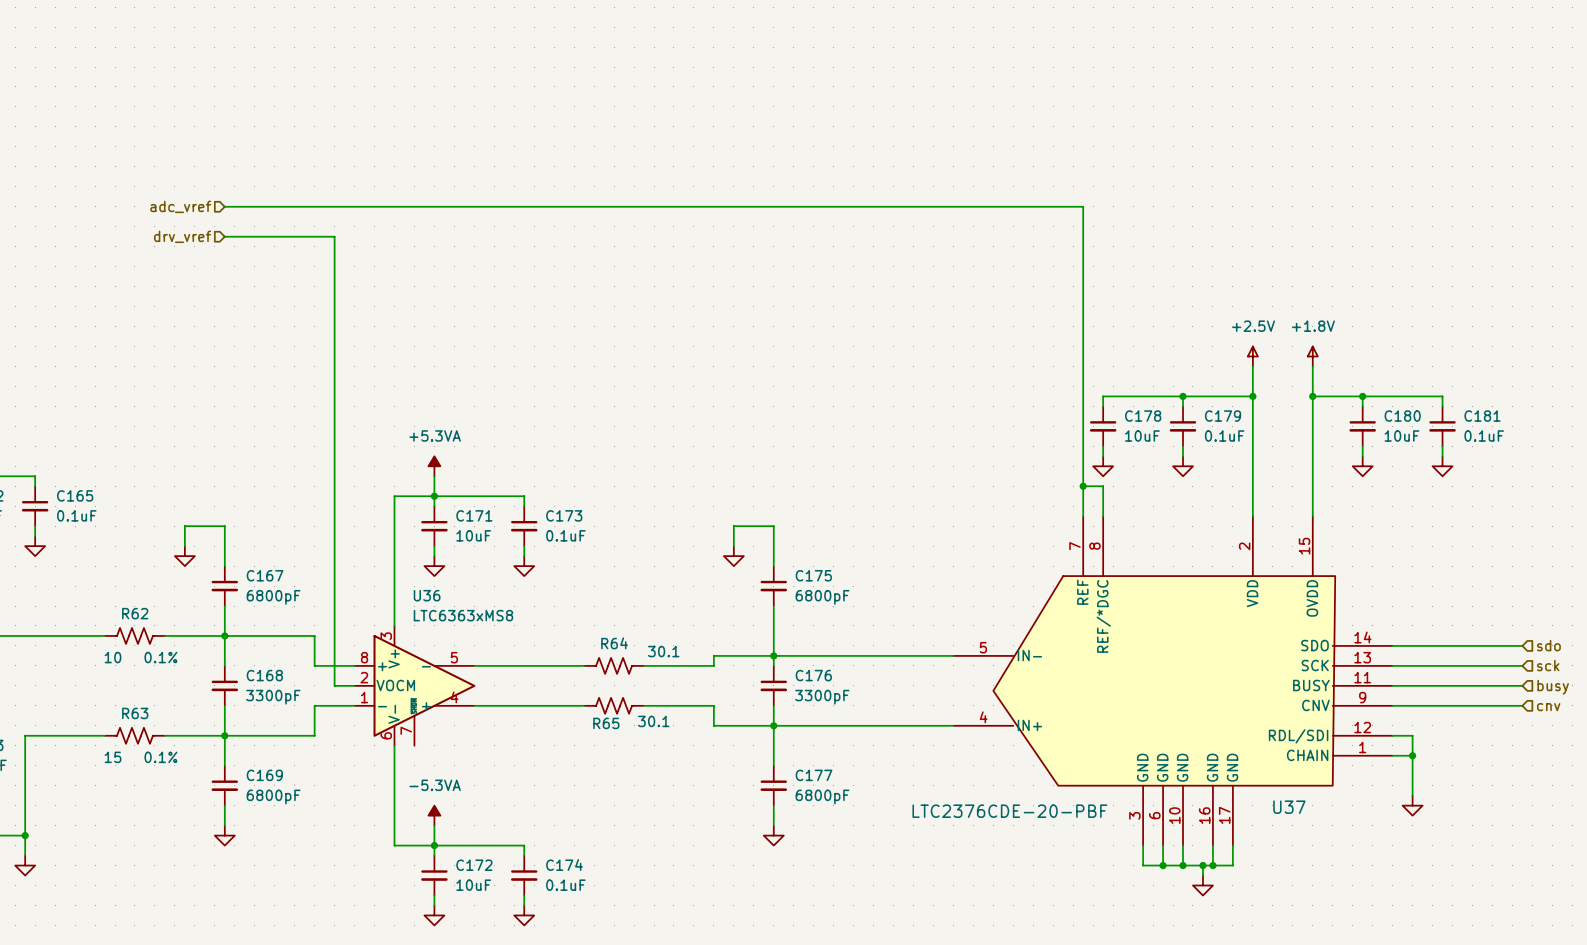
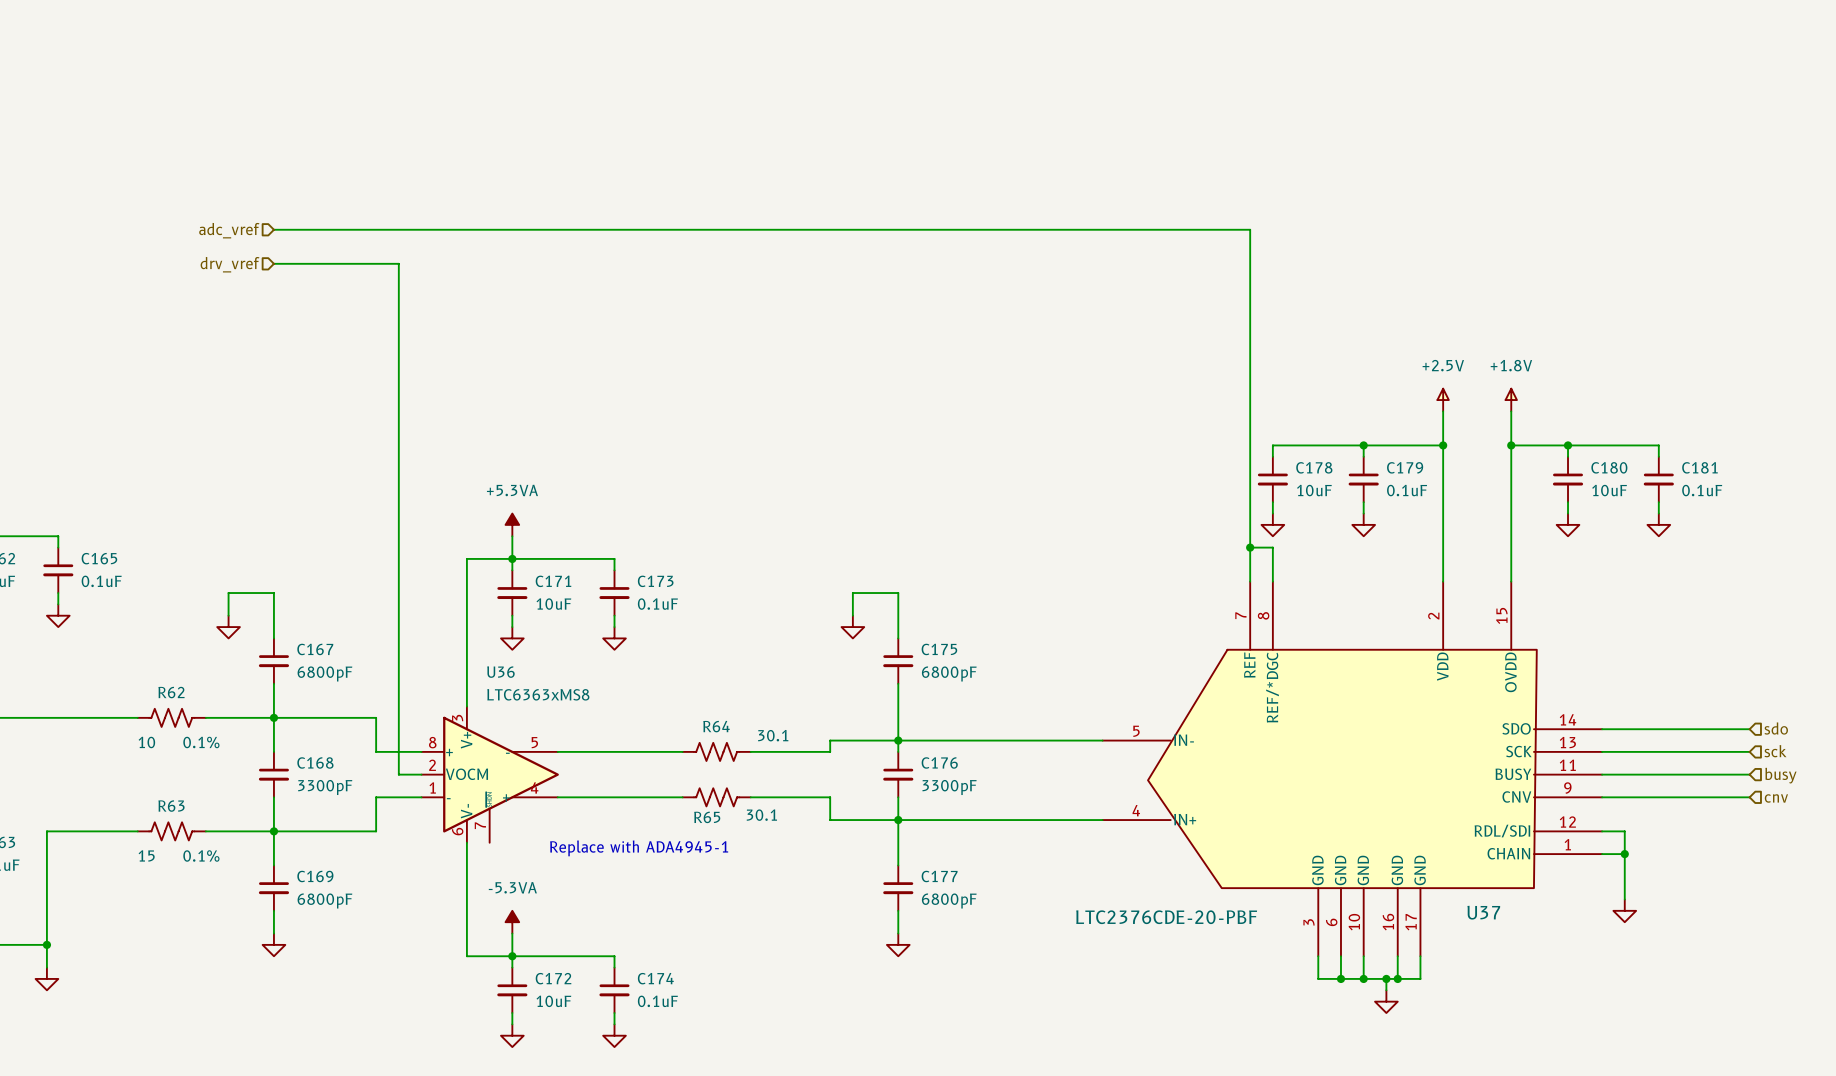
text: none -> Replace with ADA4945-1 (639, 848)

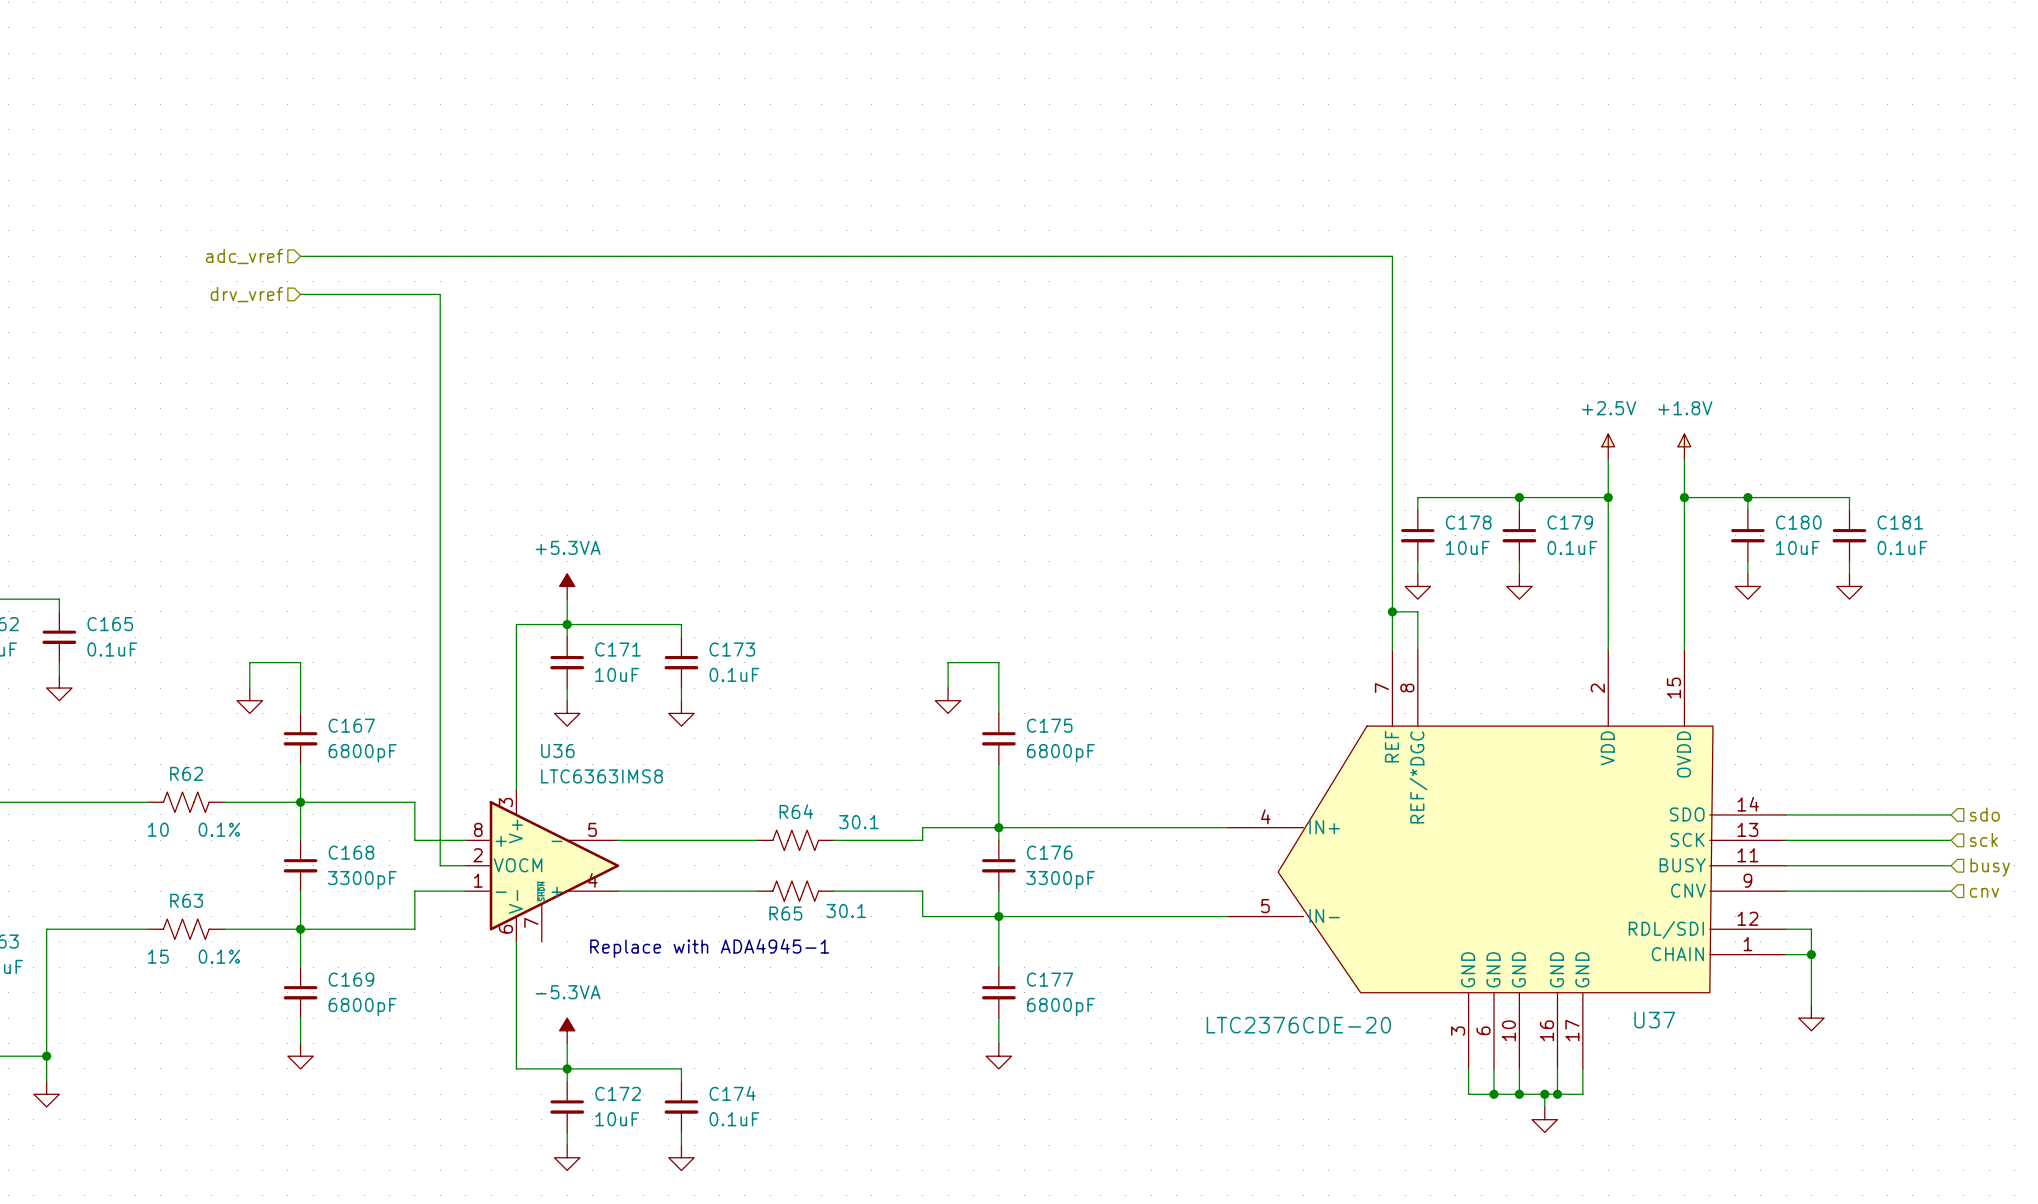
U36 value: LTC6363xMS8 (538, 694) -> LTC6363IMS8 (602, 776)
U37 pin number: 5 (1136, 731) -> 4 (1265, 816)
U37 pin name: IN- (1184, 740) -> IN+ (1324, 827)
U37 pin number: 4 (1136, 810) -> 5 (1265, 906)
U37 pin name: IN+ (1185, 819) -> IN- (1324, 916)
U37 value: LTC2376CDE-20-PBF (1166, 917) -> LTC2376CDE-20 (1298, 1025)

